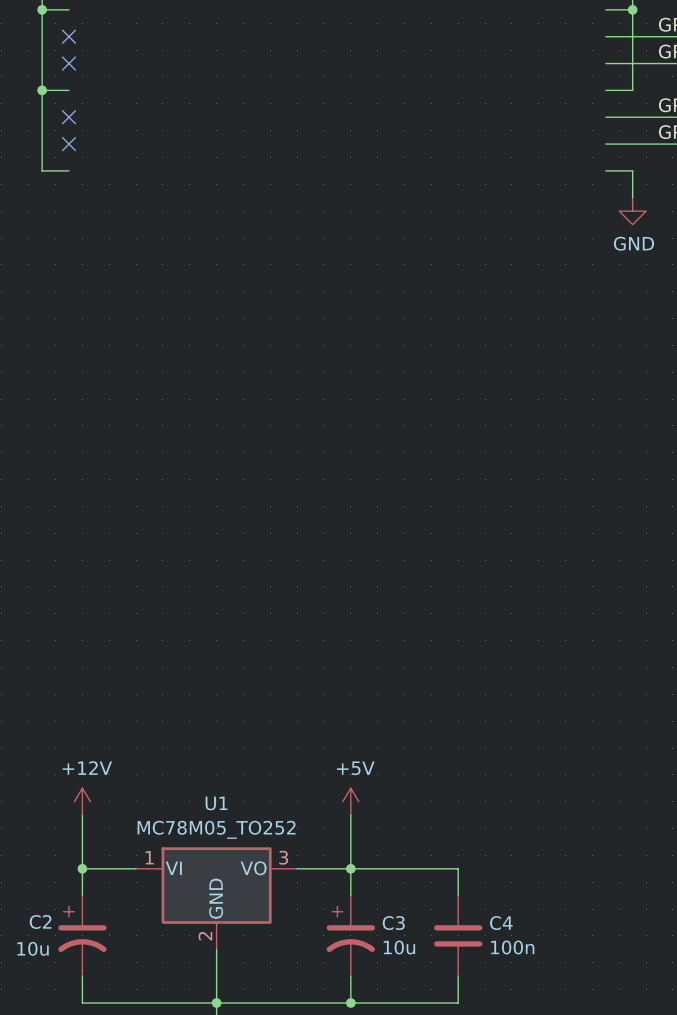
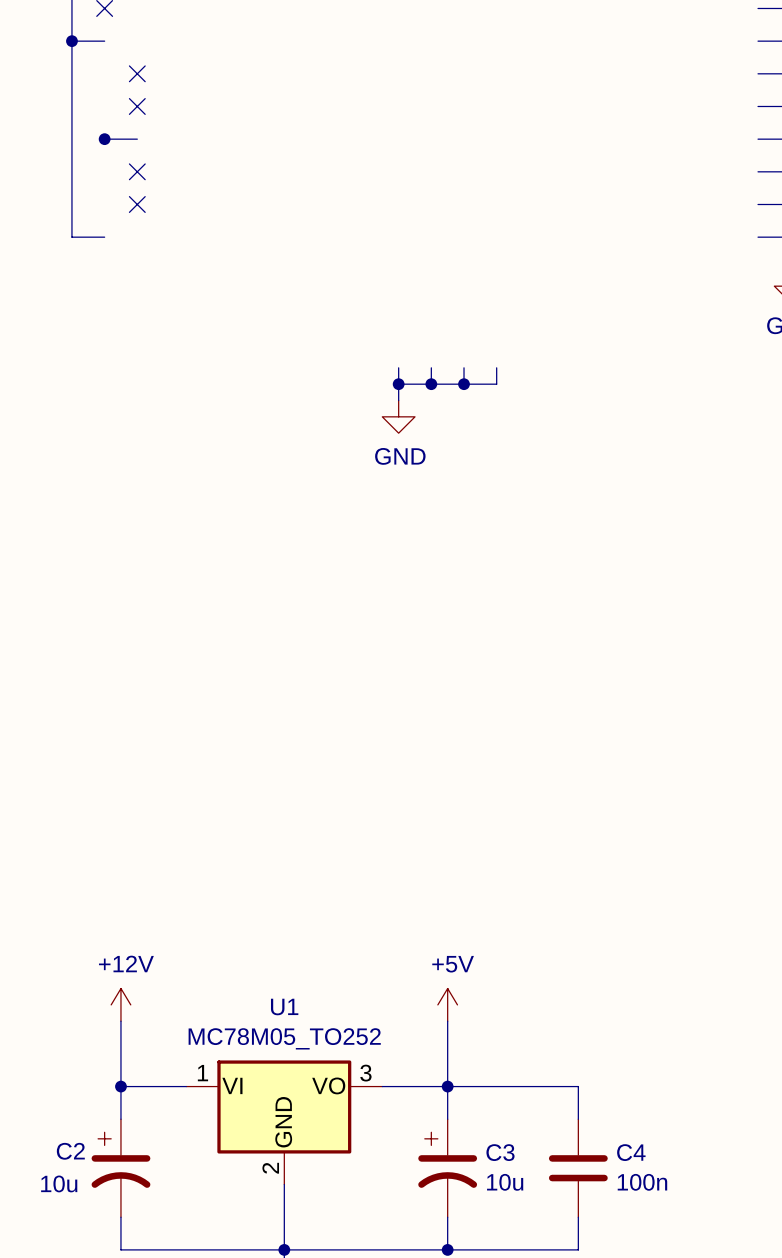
no-connect mark: (68, 36) -> none
no-connect mark: none -> (137, 73)
no-connect mark: (68, 63) -> none
no-connect mark: none -> (137, 106)
wire: (42, 90) (68, 90) -> (137, 139) (104, 139)
junction position: (42, 90) -> (104, 139)
no-connect mark: (68, 117) -> none
no-connect mark: none -> (137, 171)
no-connect mark: (68, 144) -> none
no-connect mark: none -> (137, 204)
wire: none -> (398, 367) (398, 400)
wire: none -> (431, 367) (431, 384)
wire: none -> (464, 367) (464, 384)
wire: none -> (496, 367) (496, 384) (398, 384)
junction: none -> (398, 384)
junction: none -> (431, 384)
junction: none -> (464, 384)
power symbol: none -> GND (398, 416)

